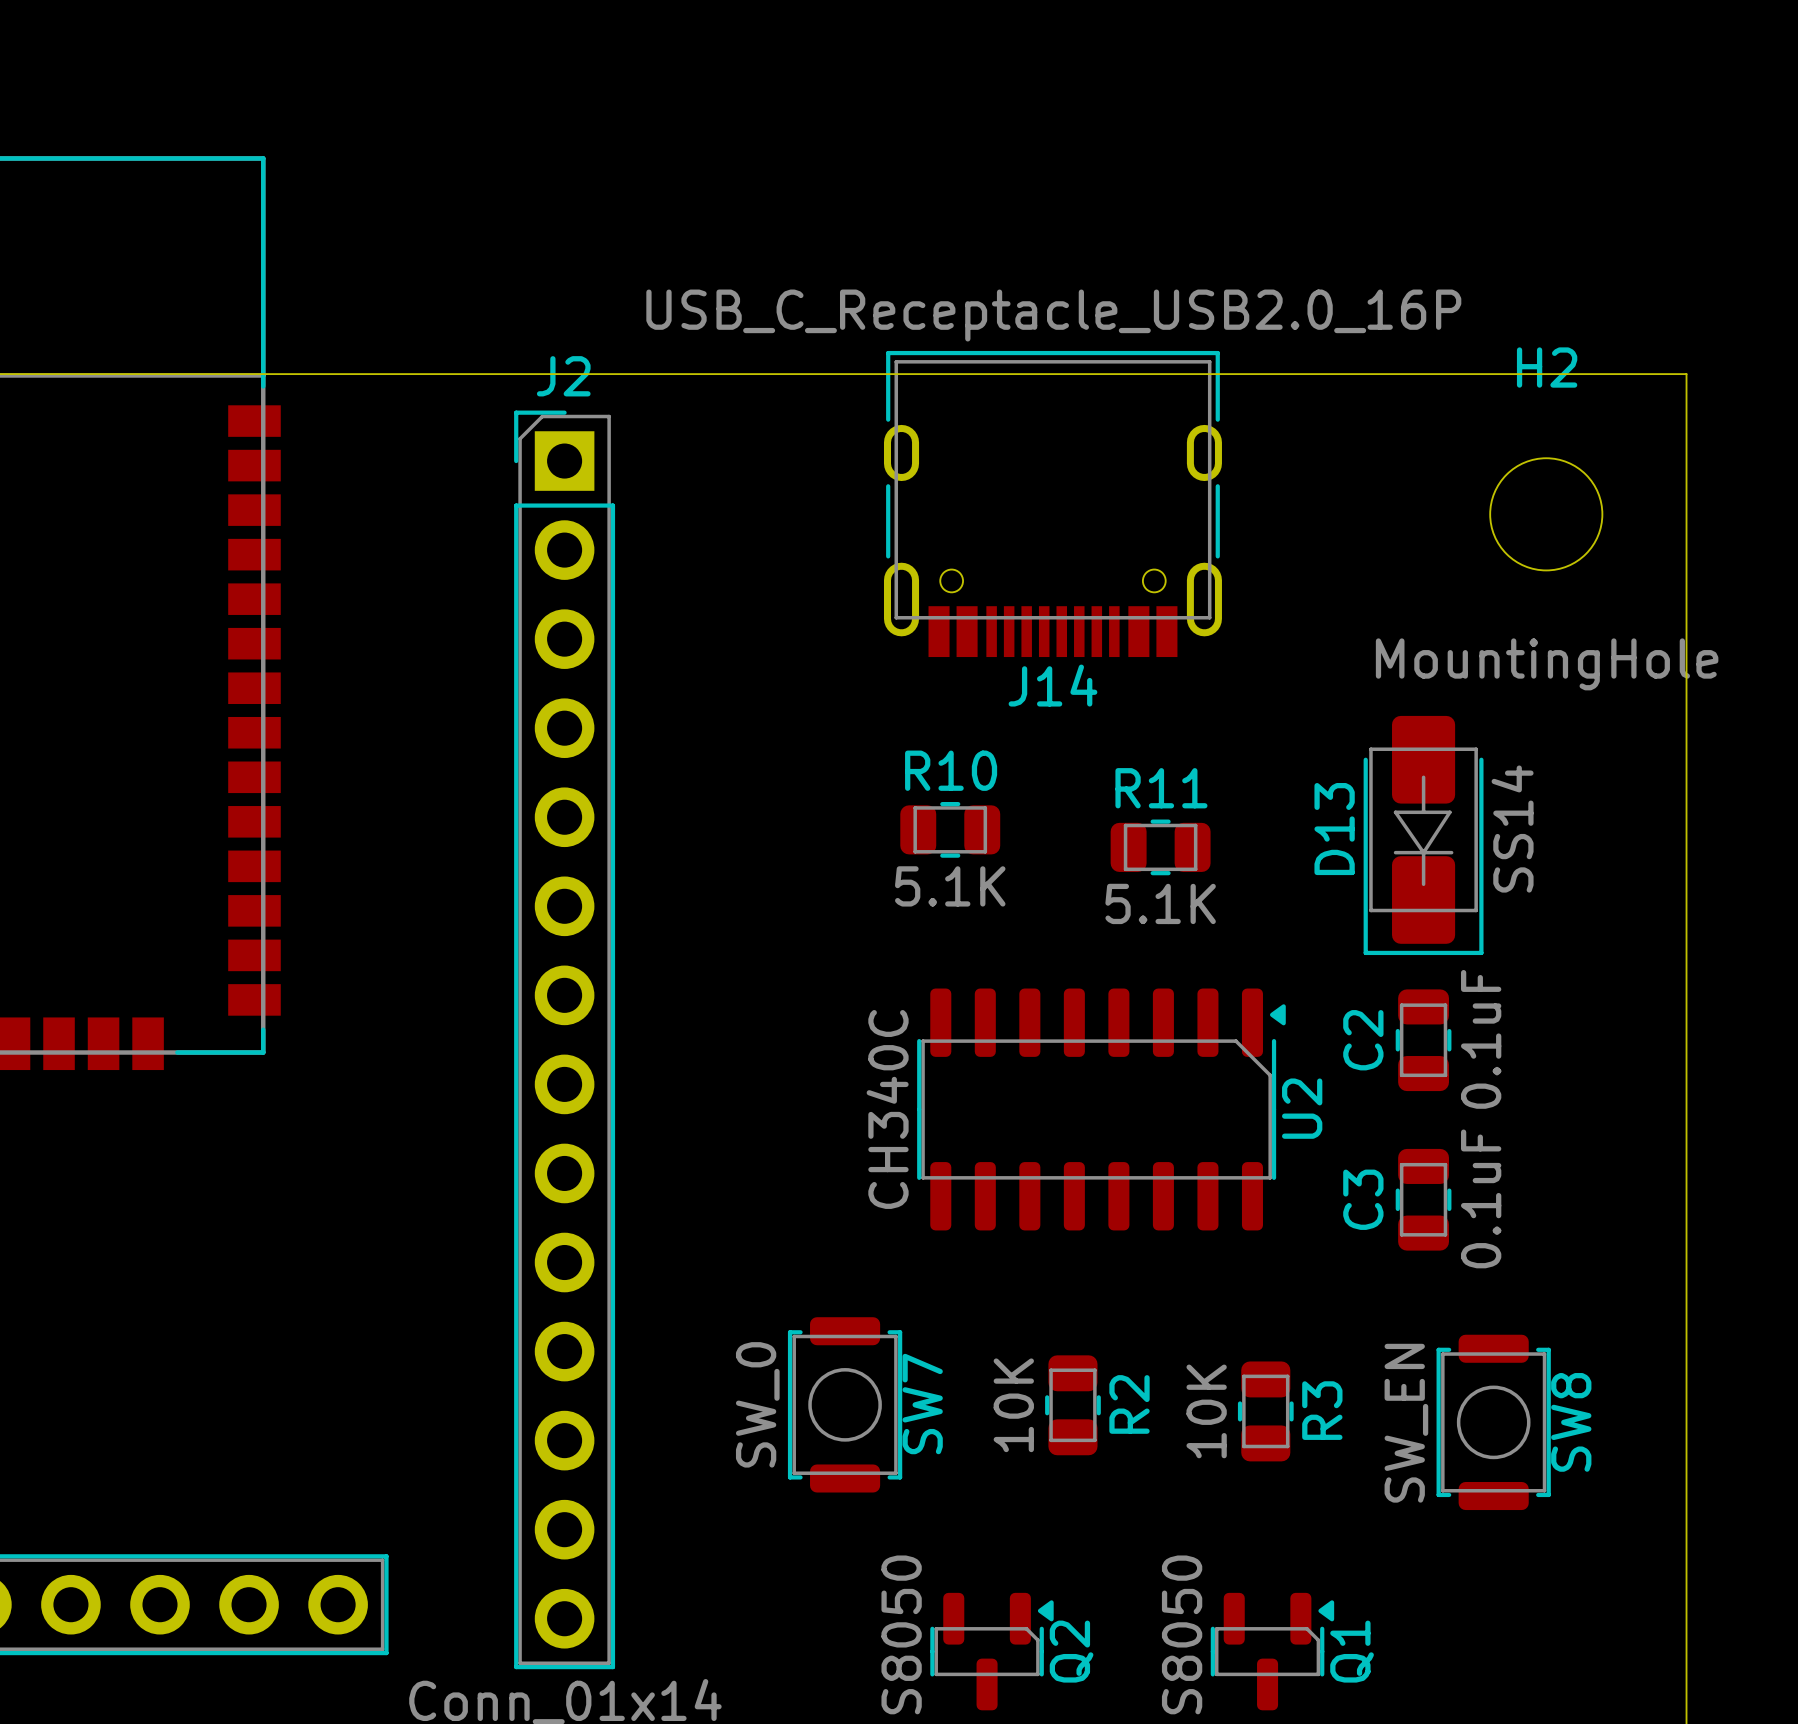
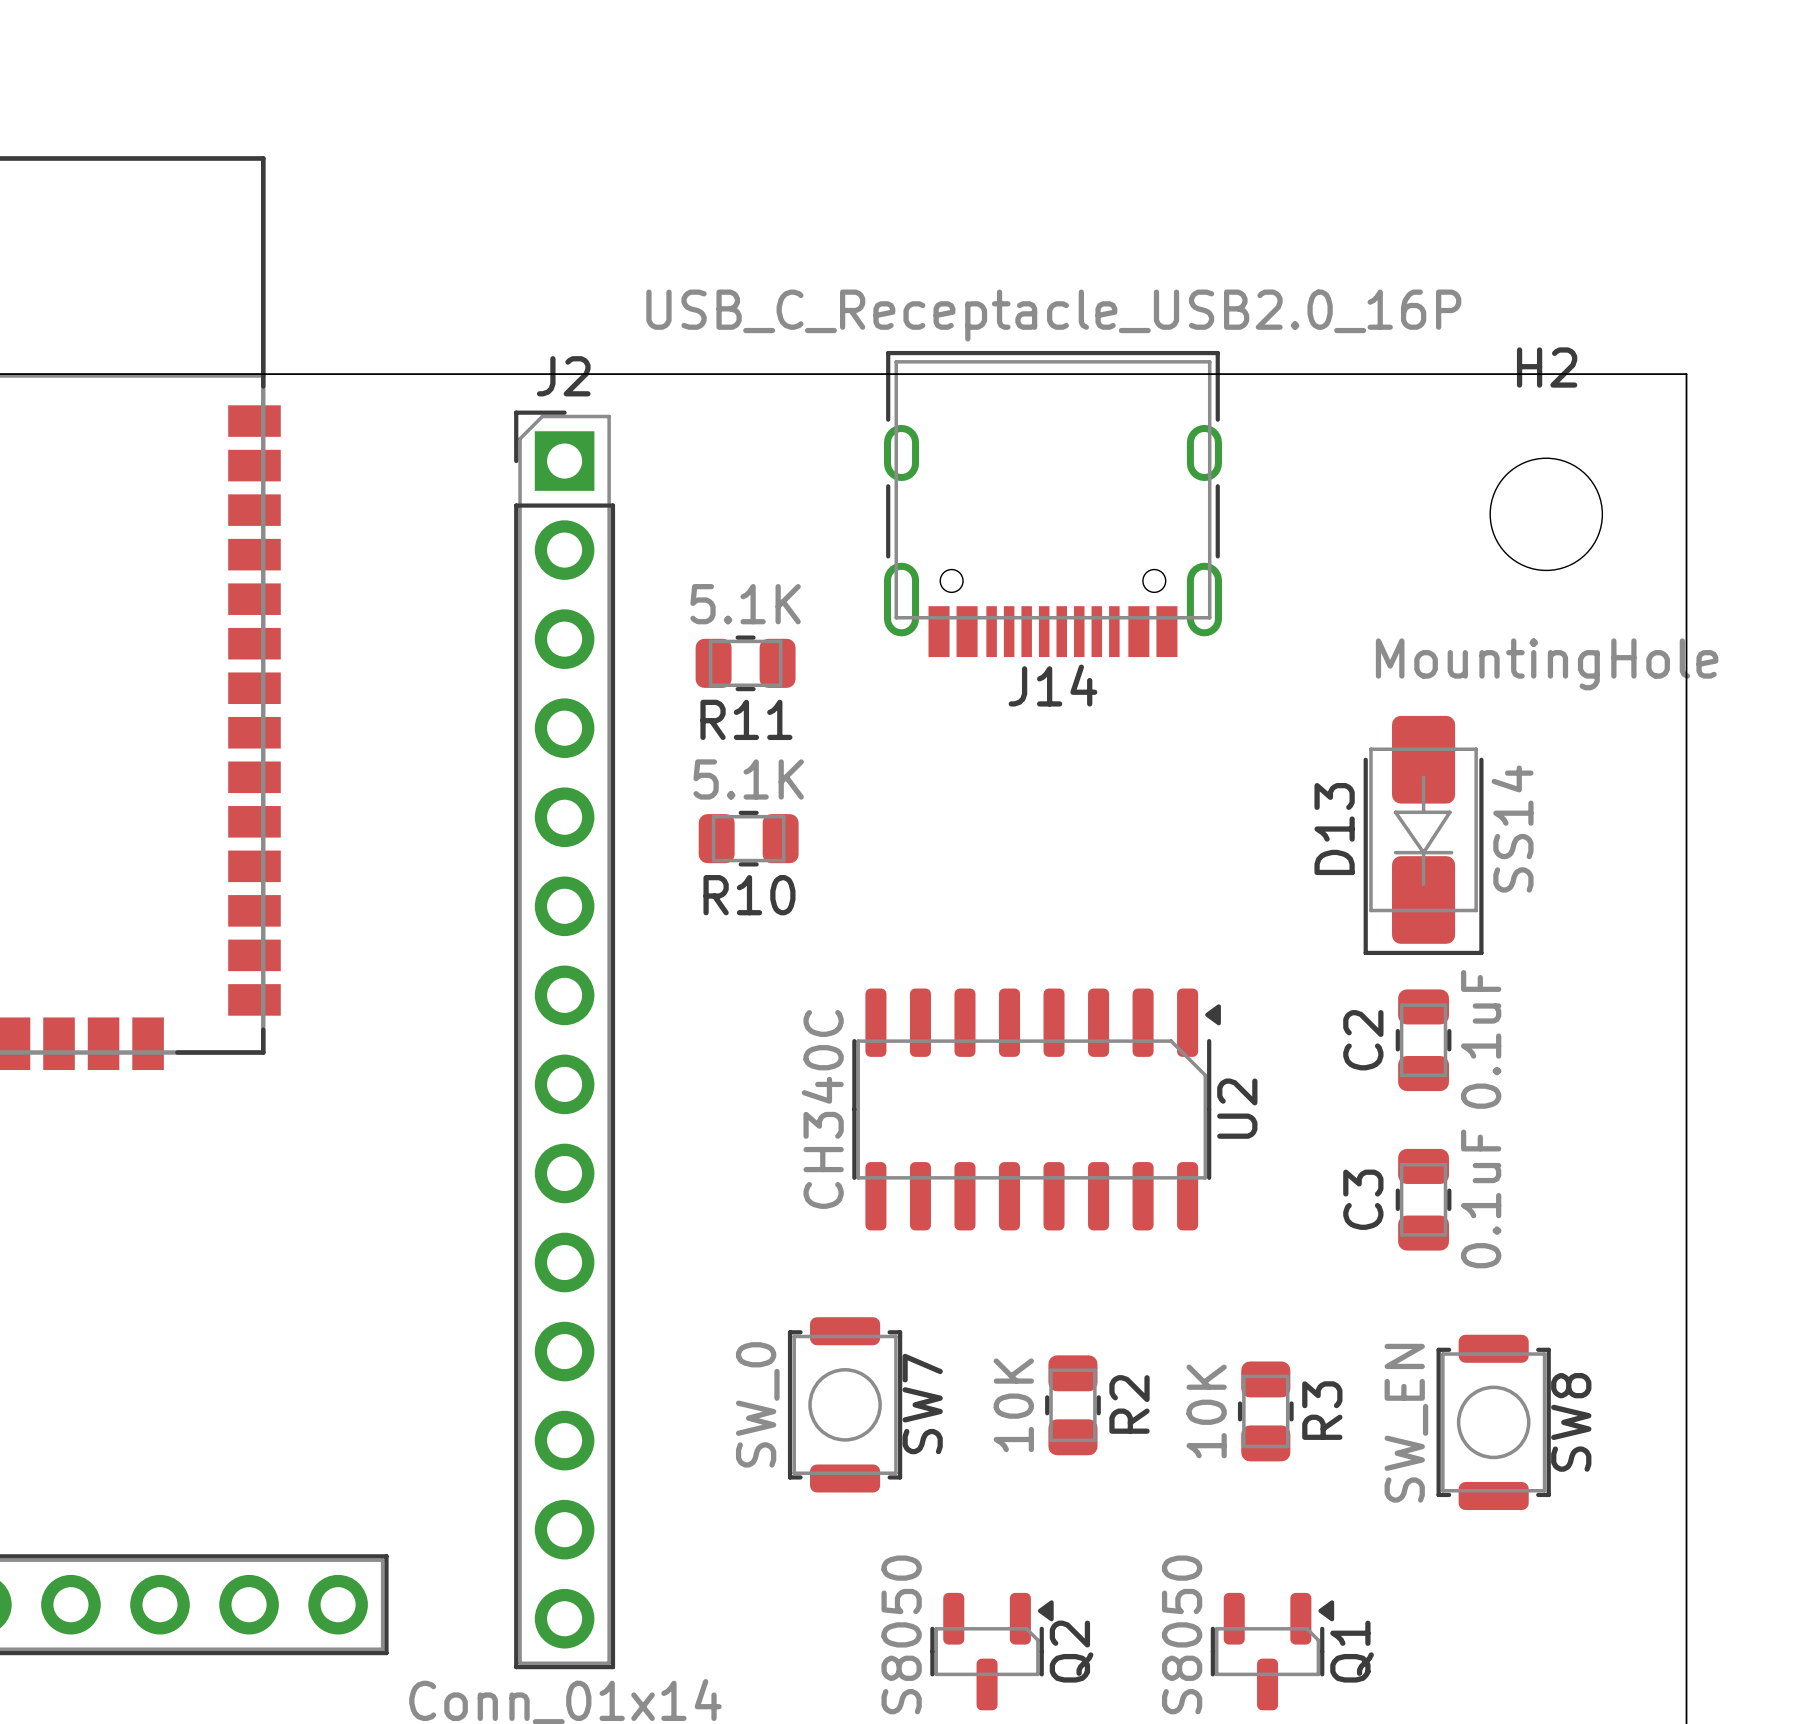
R10 name position: R10 (951, 770) -> R10 (749, 895)
R11 name position: R11 (1161, 788) -> R11 (746, 719)
R10 position: (950, 829) -> (748, 838)
R11 position: (1160, 847) -> (745, 663)
R10 value position: 5.1K (950, 886) -> 5.1K (748, 779)
R11 value position: 5.1K (1160, 903) -> 5.1K (745, 604)
U2 position: (1101, 1109) -> (1036, 1109)

